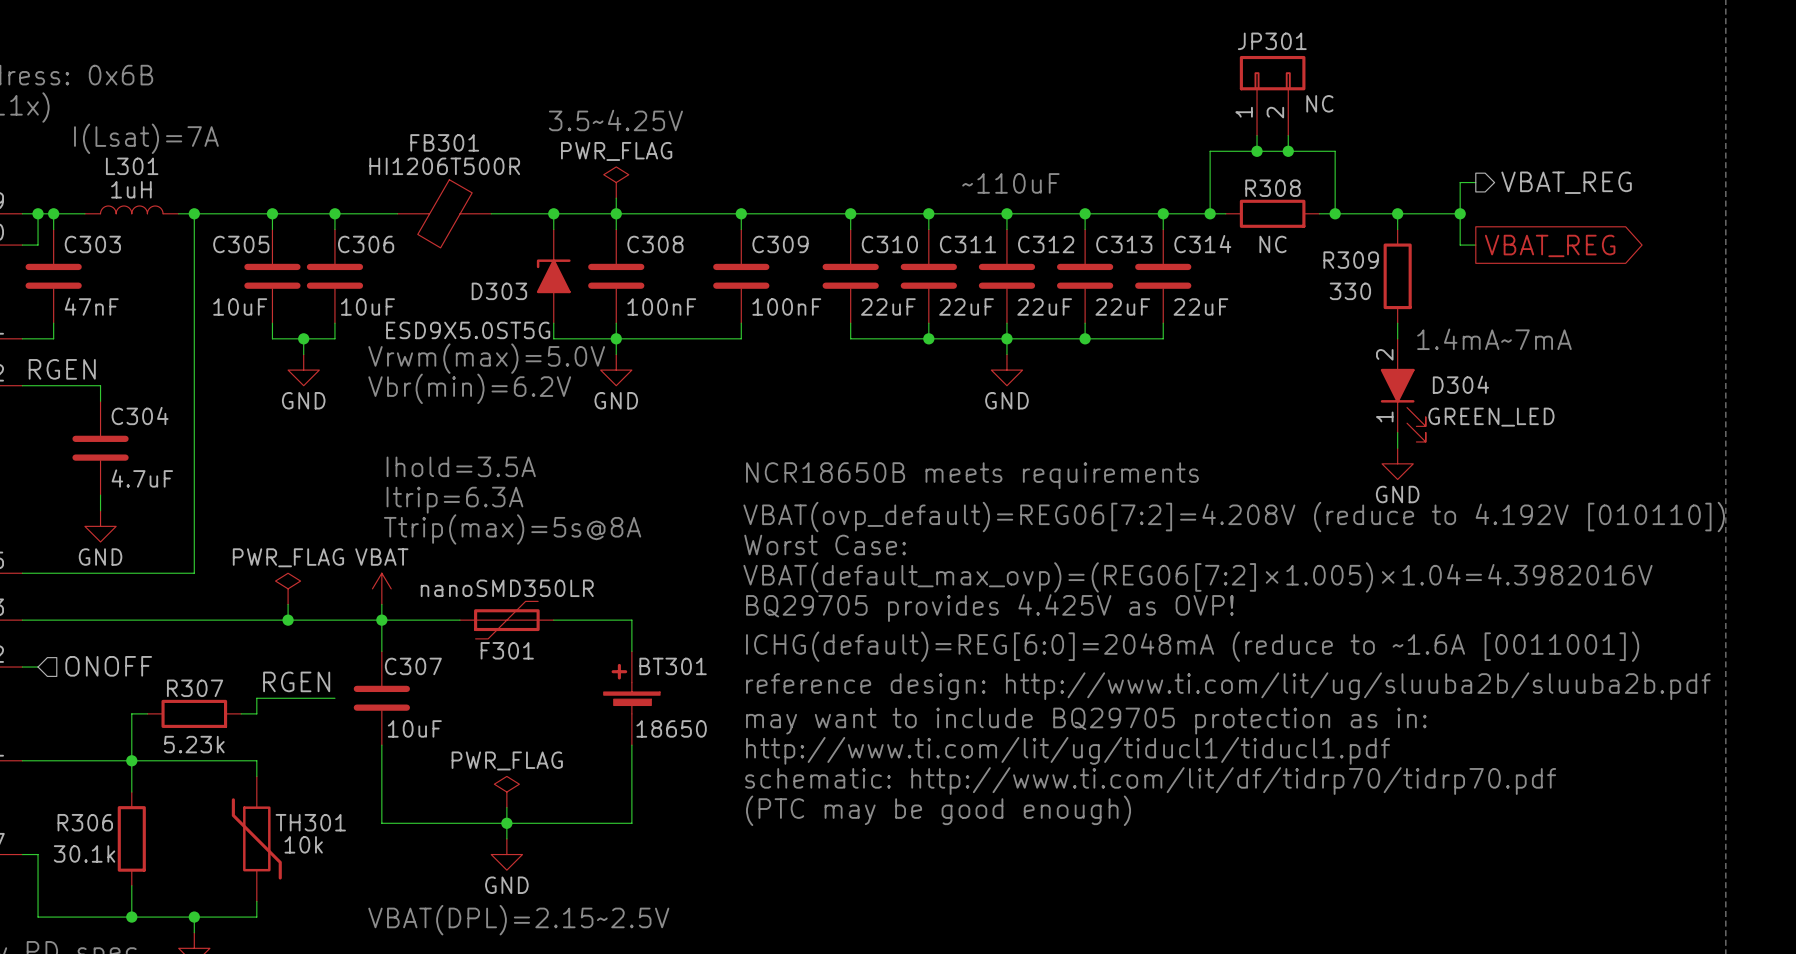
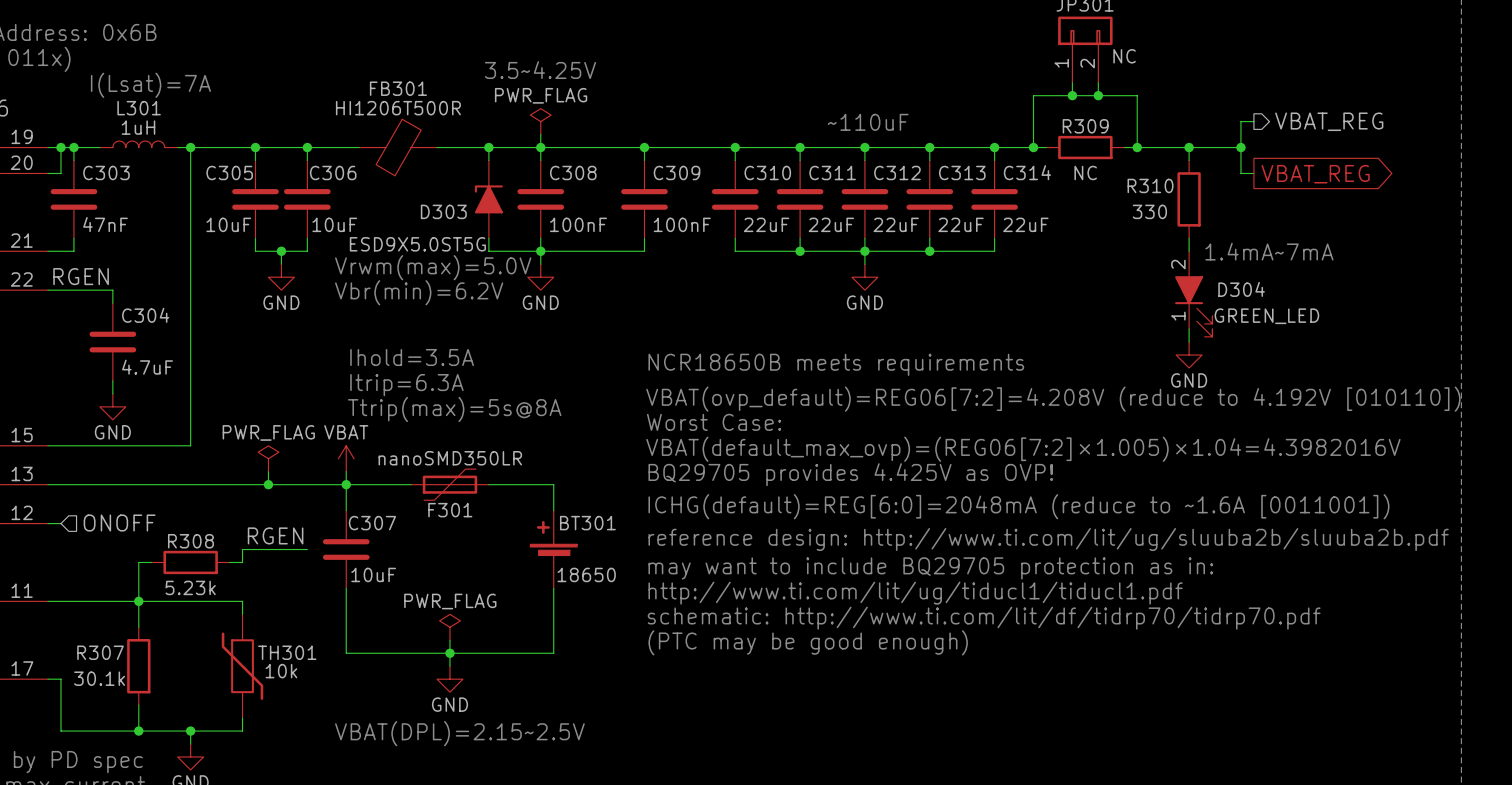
R308 name: R308 (1273, 188) -> R309 (1085, 126)
R309 name: R309 (1351, 260) -> R310 (1150, 185)
R307 name: R307 (195, 688) -> R308 (190, 541)
R306 name: R306 (85, 822) -> R307 (100, 652)

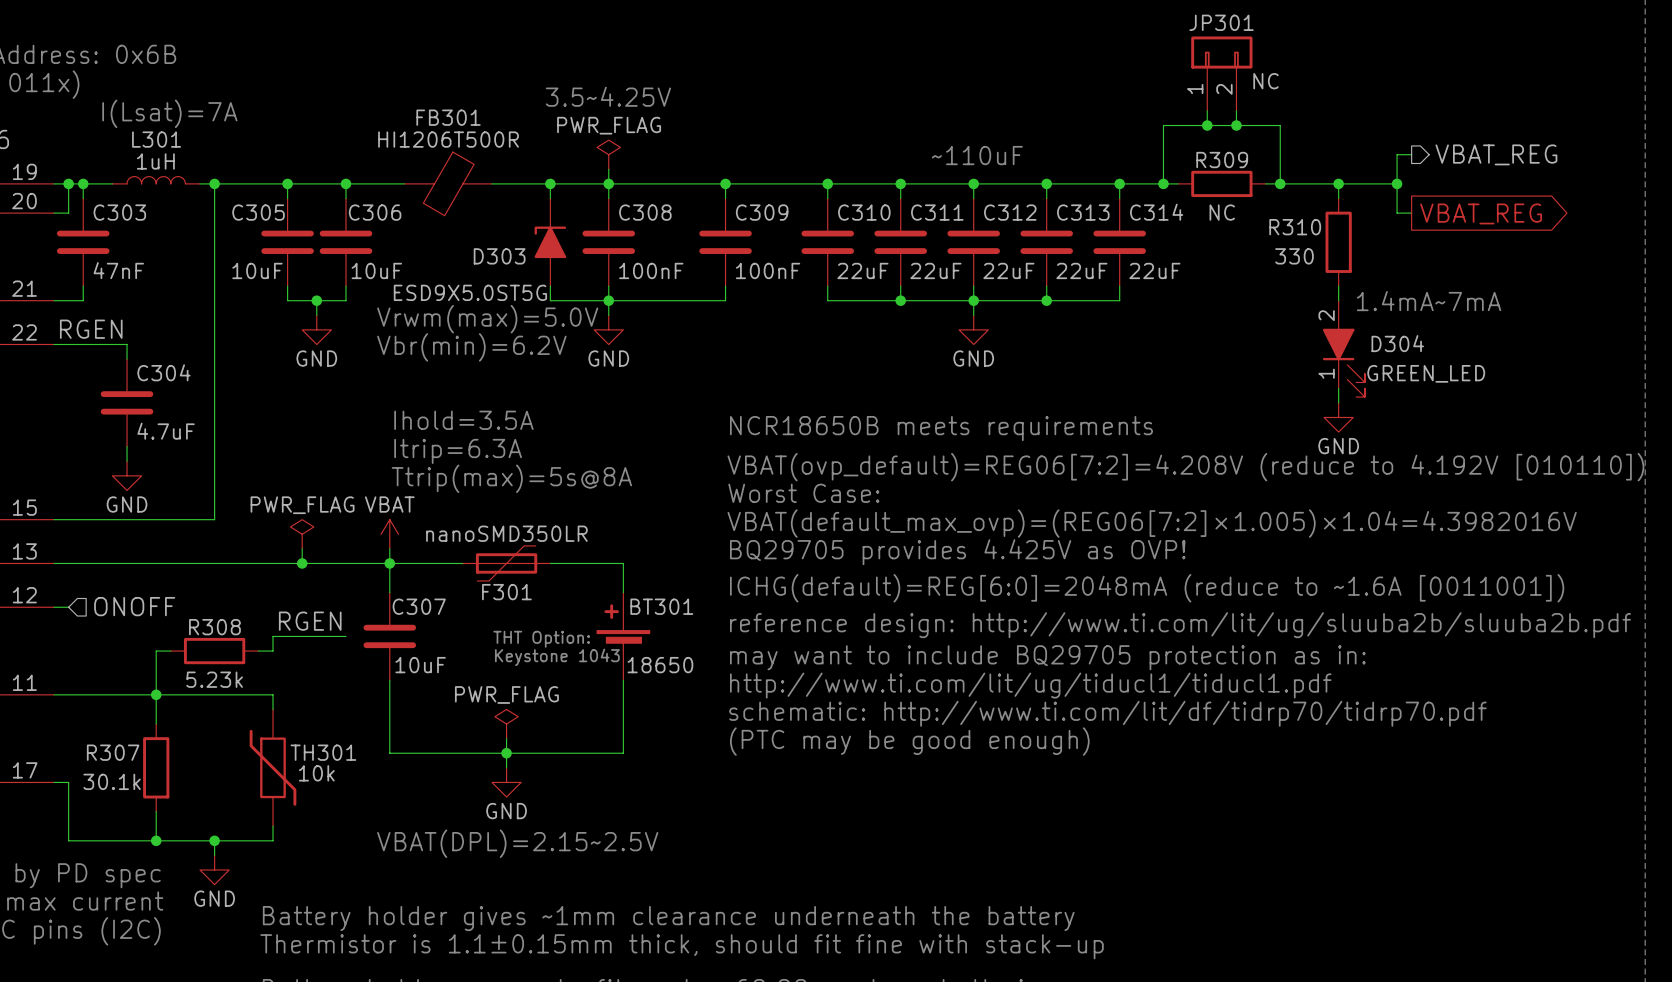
text: none -> THT Option: (541, 639)
text: none -> Keystone 1043 (557, 657)

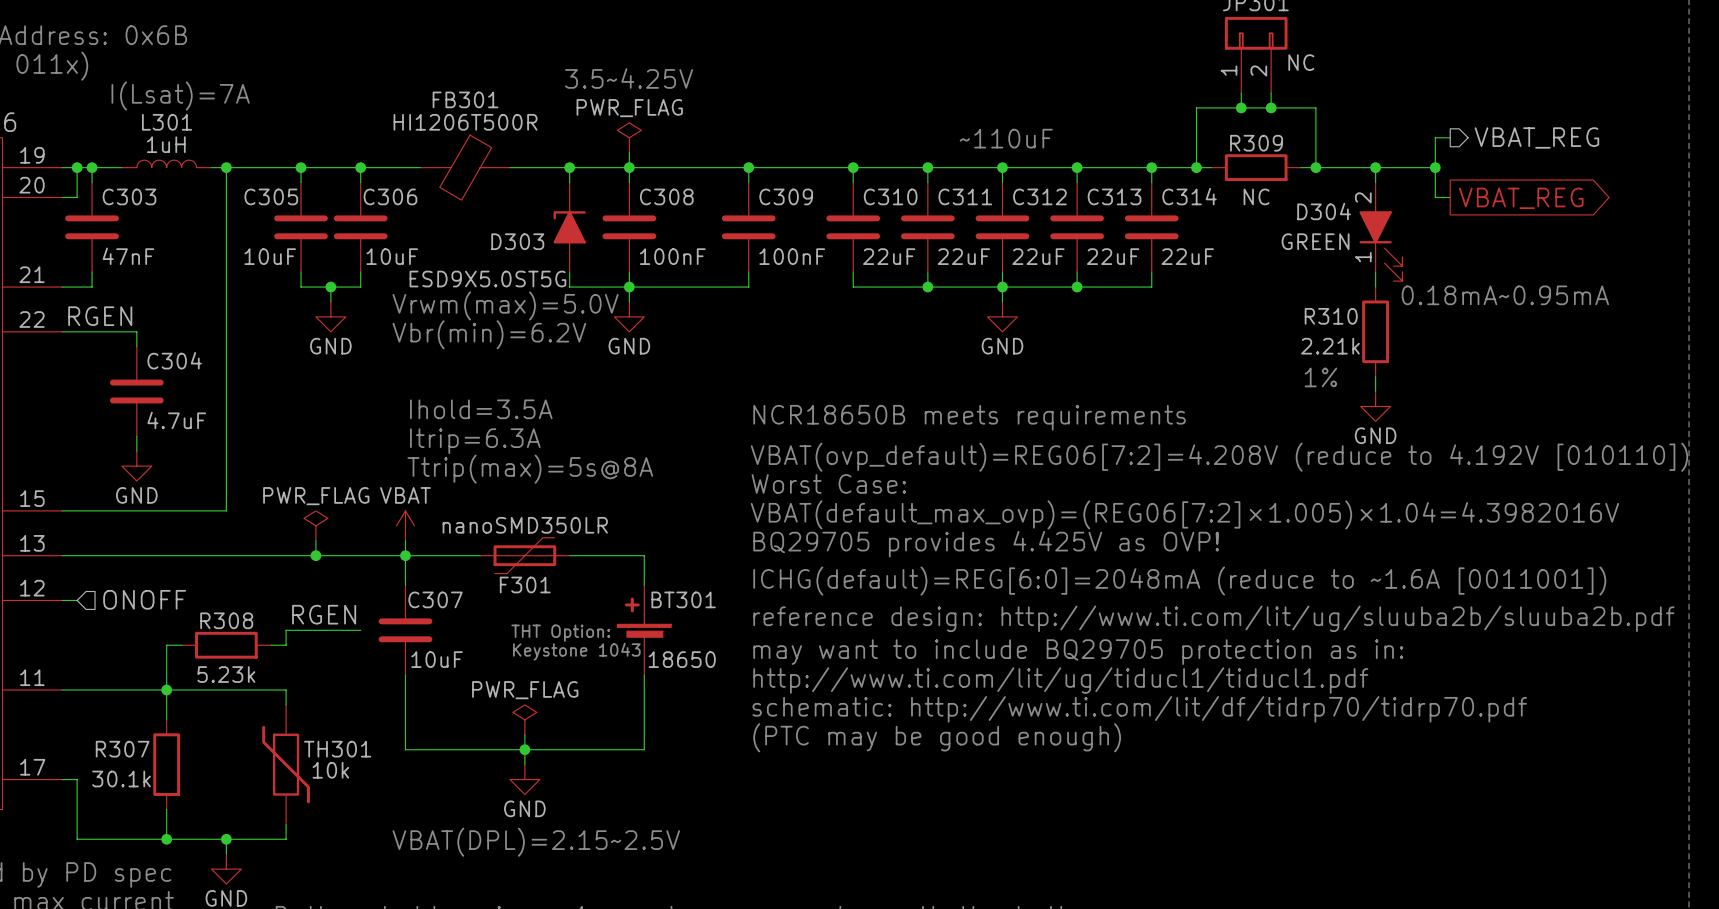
R310 position: (1338, 242) -> (1375, 331)
R310 value: 330 (1294, 256) -> 2.21k (1330, 346)
text: 1.4mA~7mA (1429, 301) -> 0.18mA~0.95mA (1505, 295)
D304 name position: D304 (1397, 343) -> D304 (1324, 211)
D304 position: (1343, 348) -> (1380, 231)
D304 value: GREEN_LED (1426, 373) -> GREEN (1315, 241)
text: none -> 1% (1320, 377)

